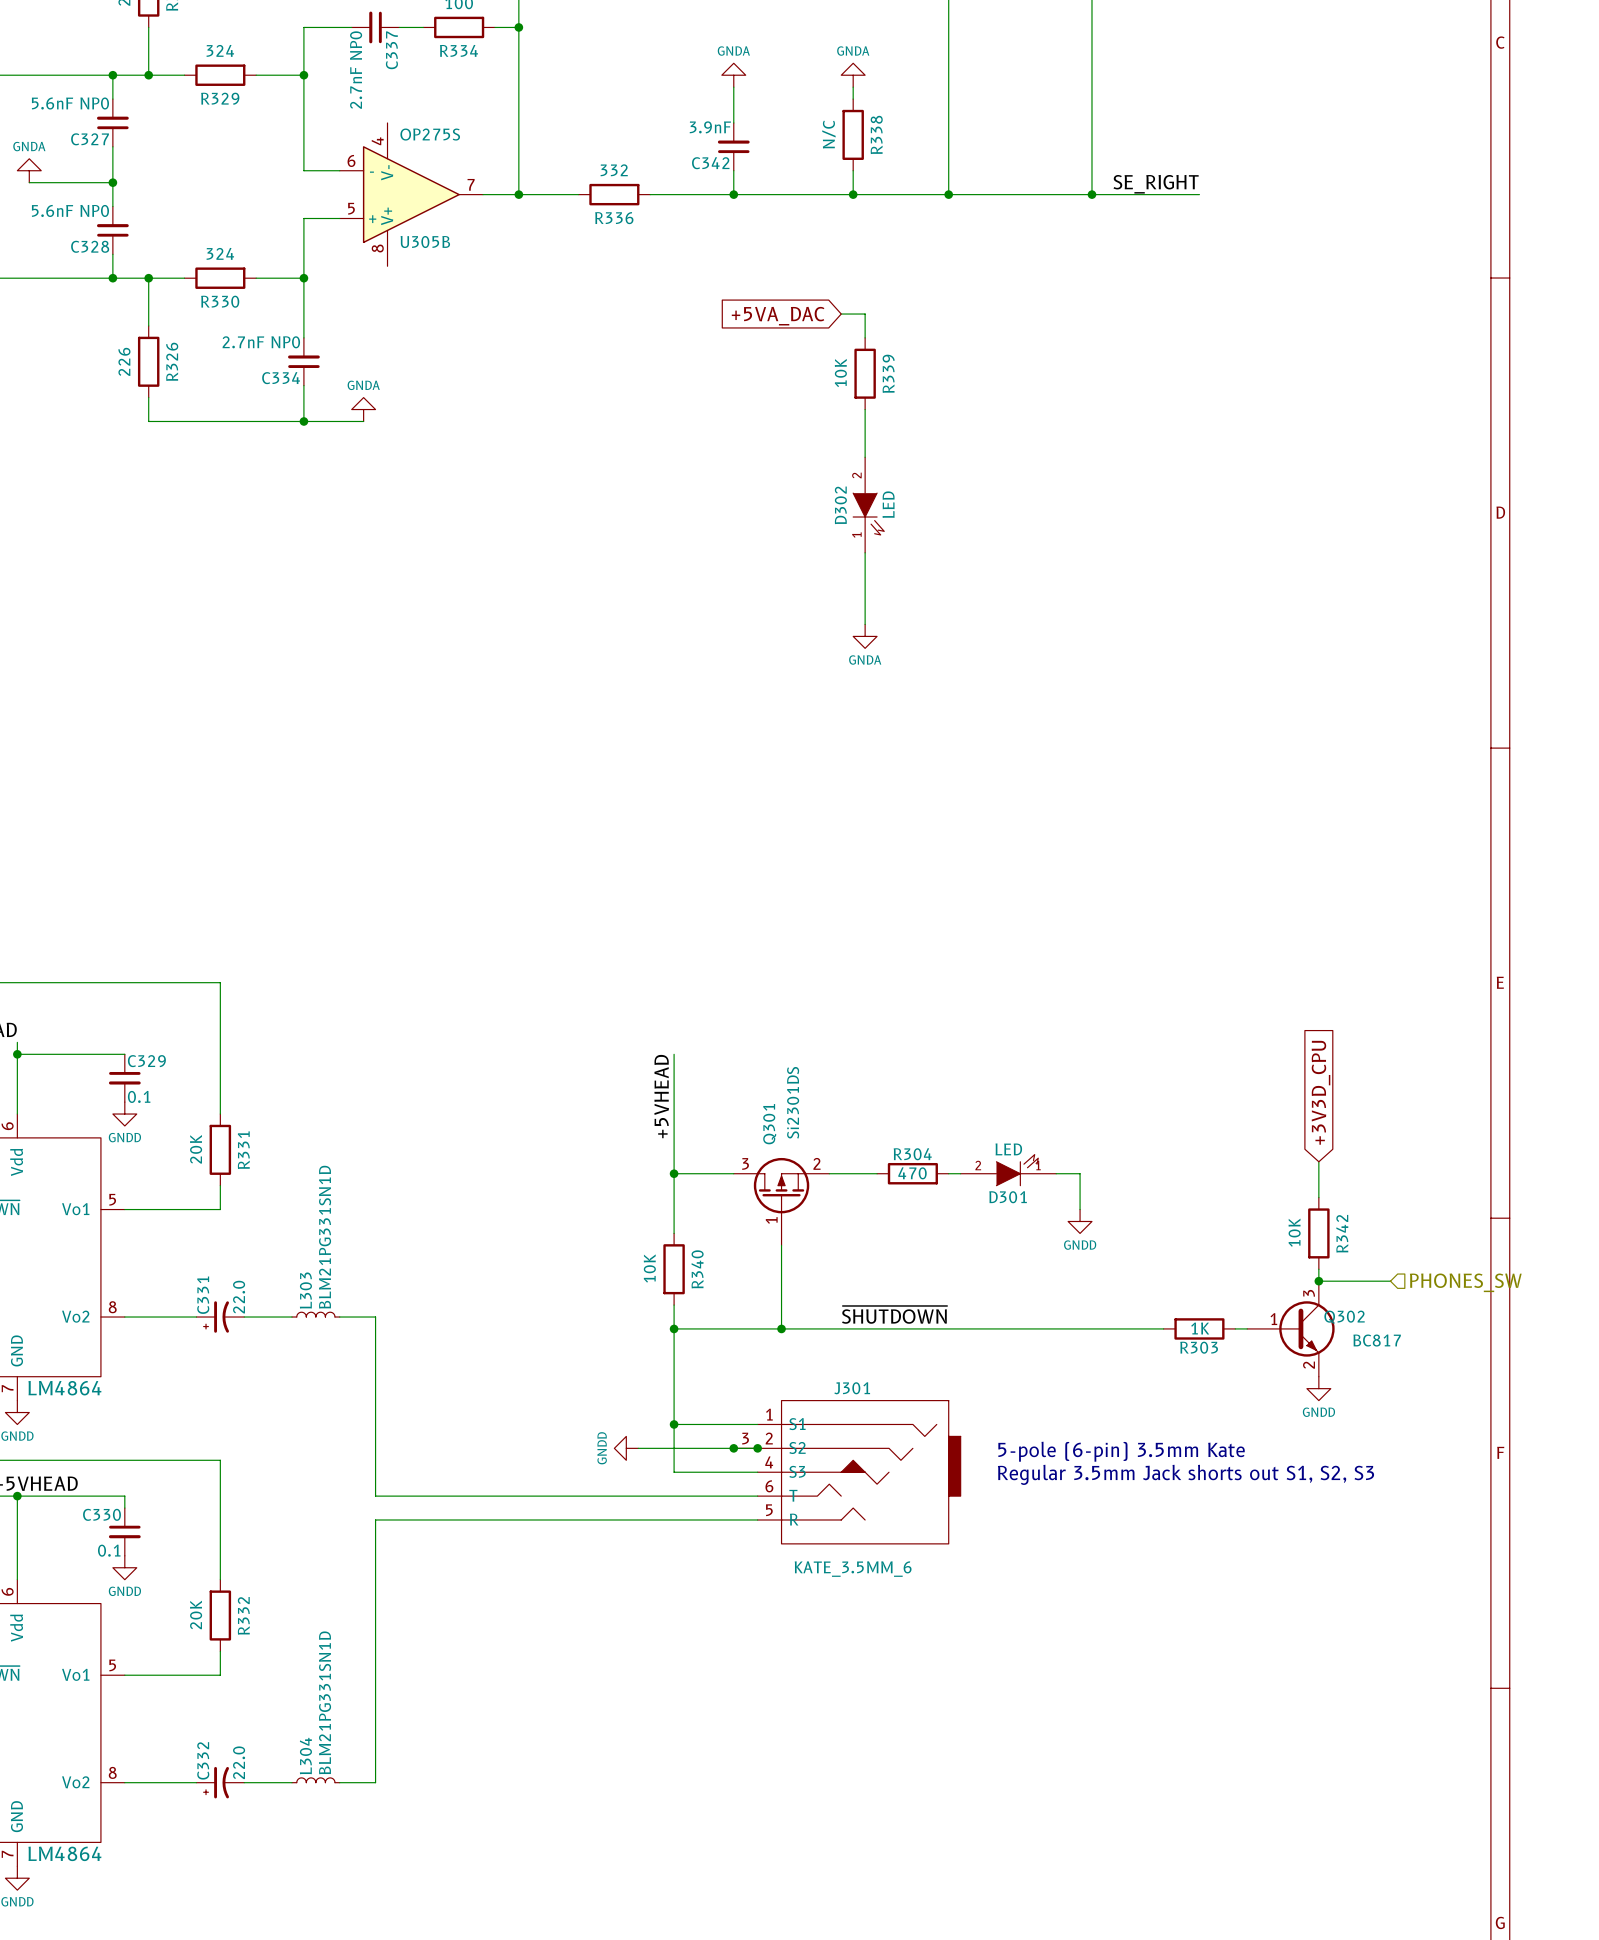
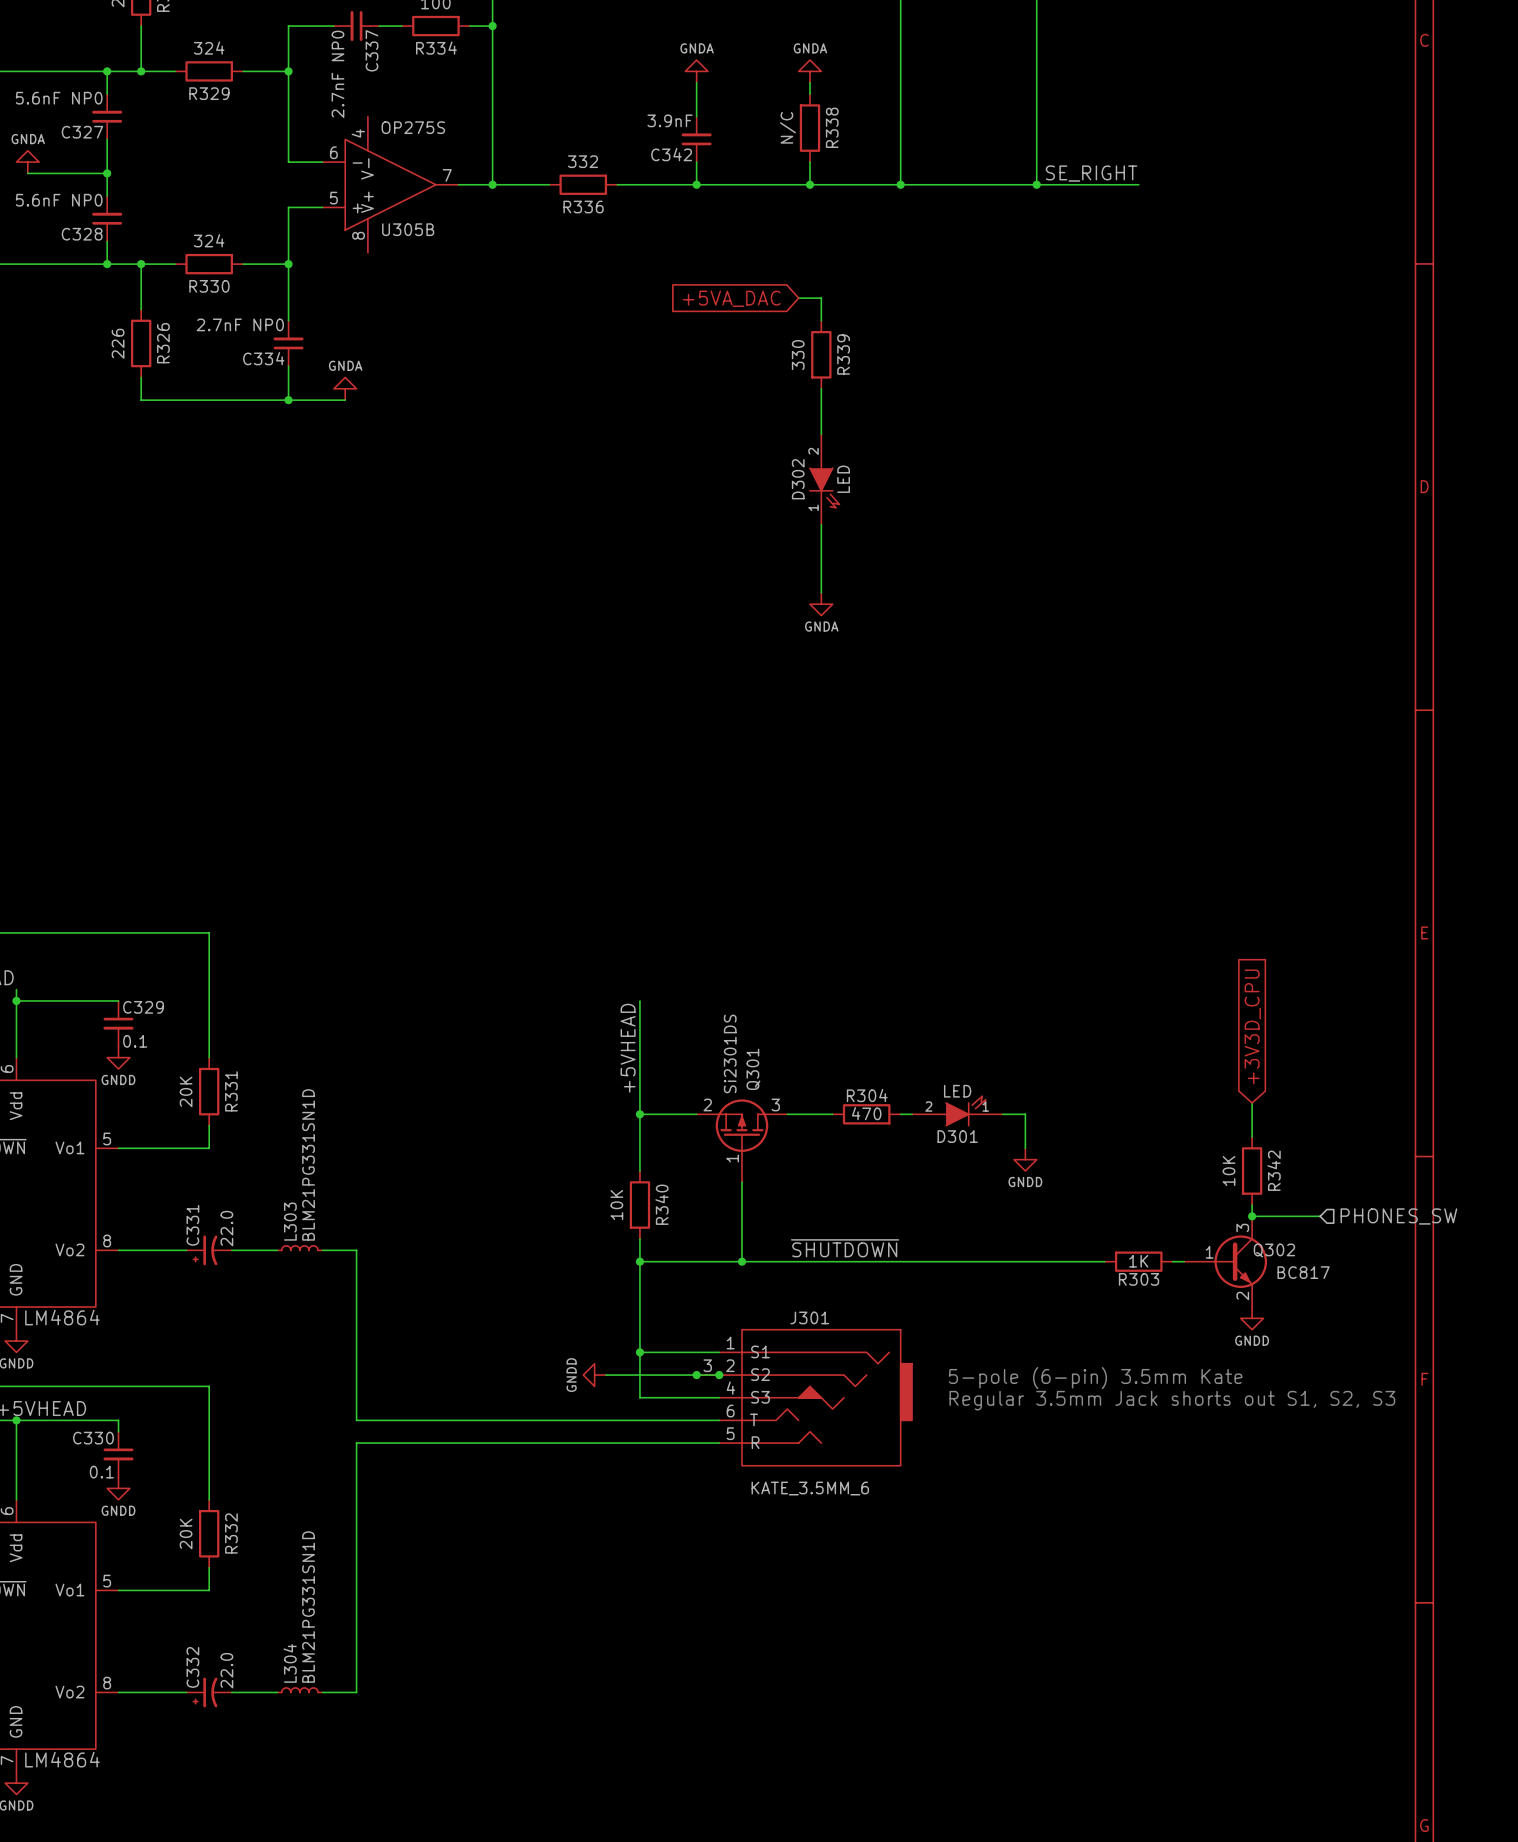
R339 value: 10K (840, 372) -> 330 (798, 355)
Q301 flip: as is (781, 1185) -> left-right (741, 1125)

